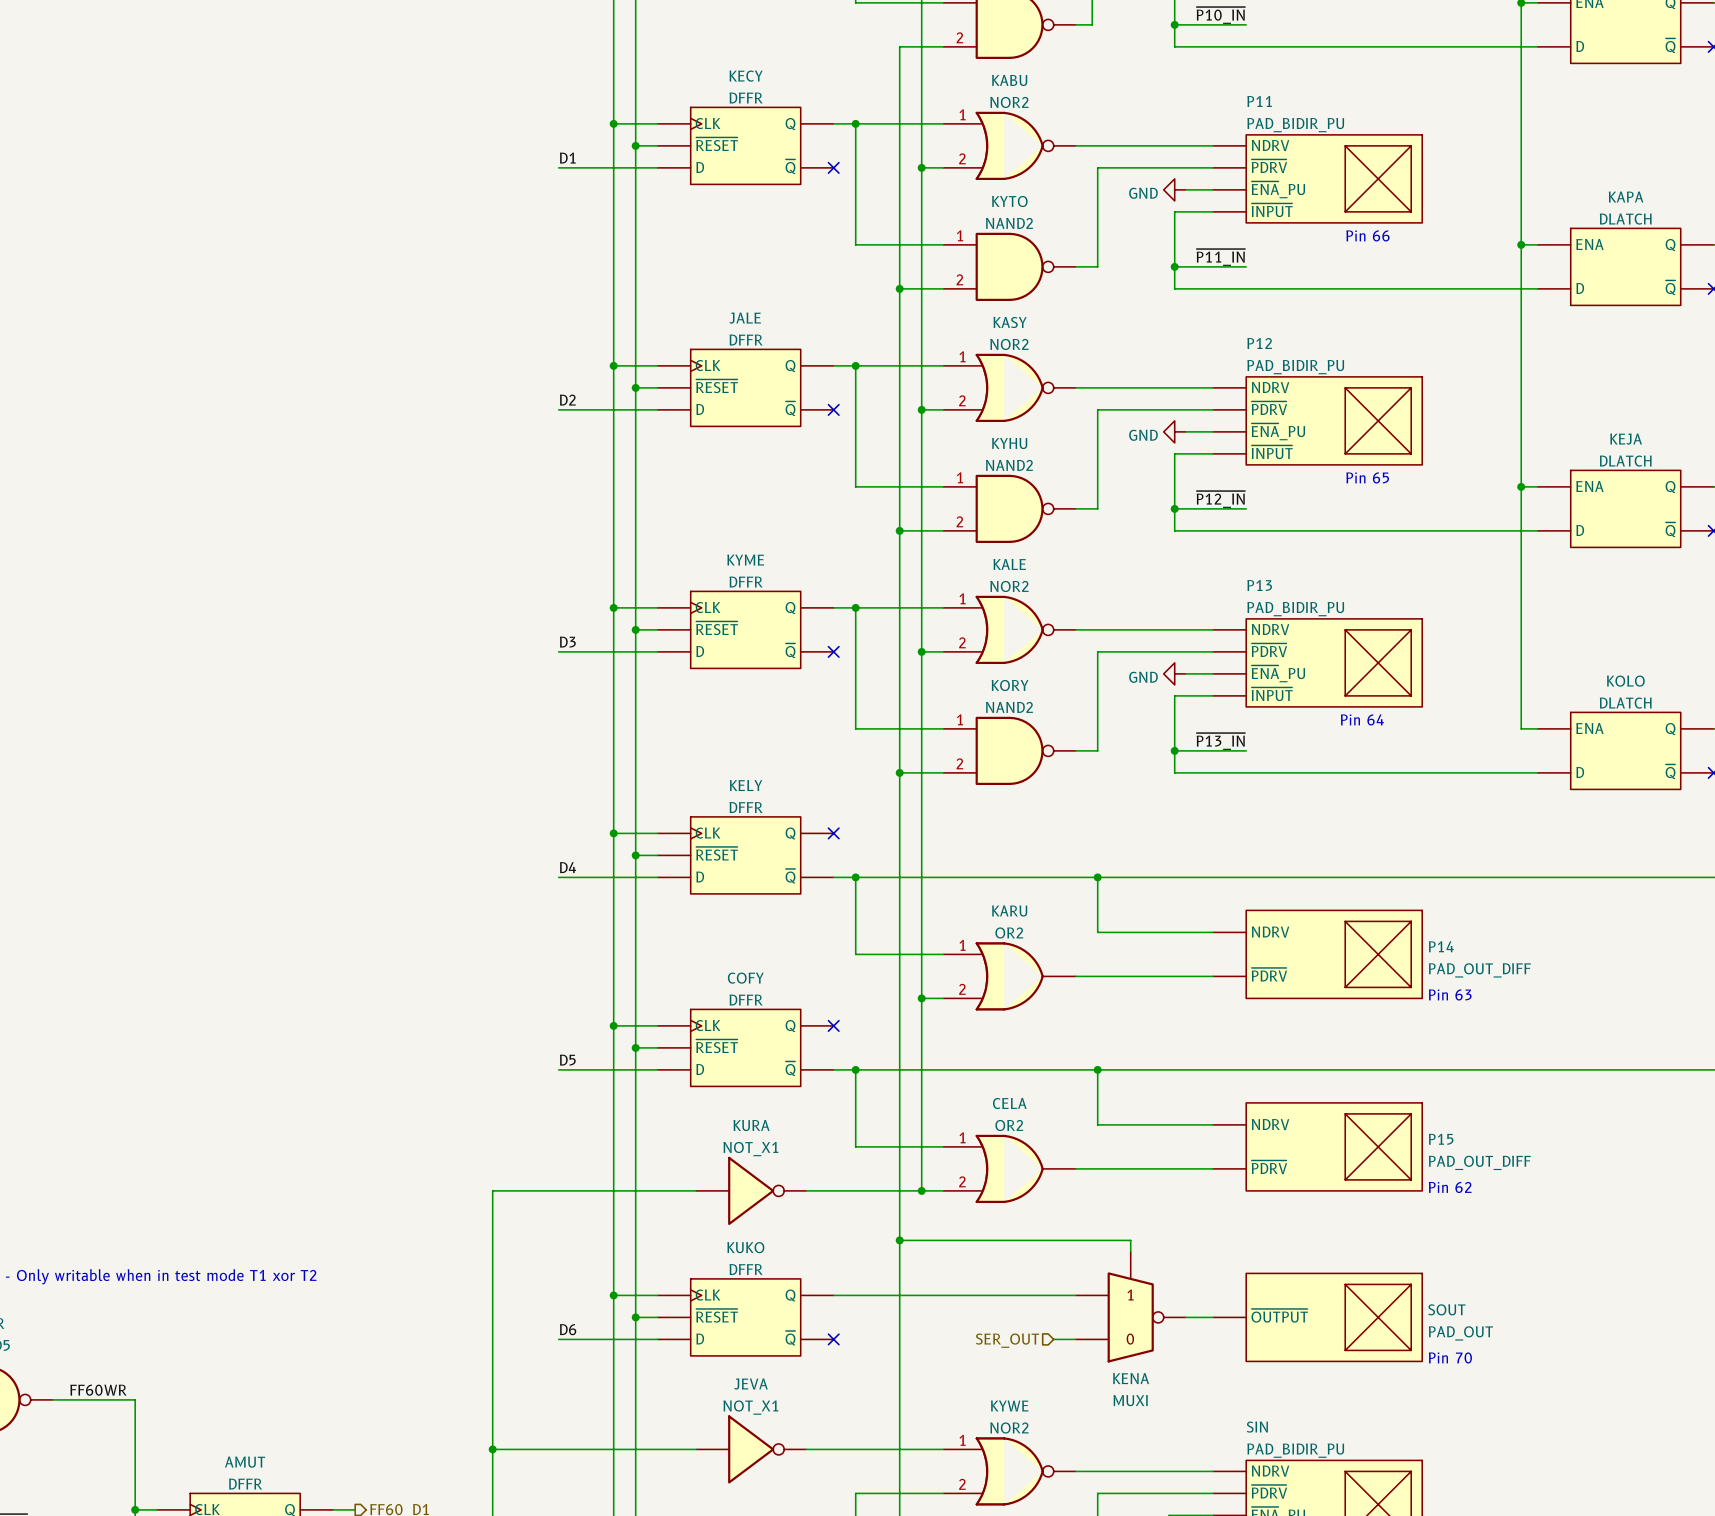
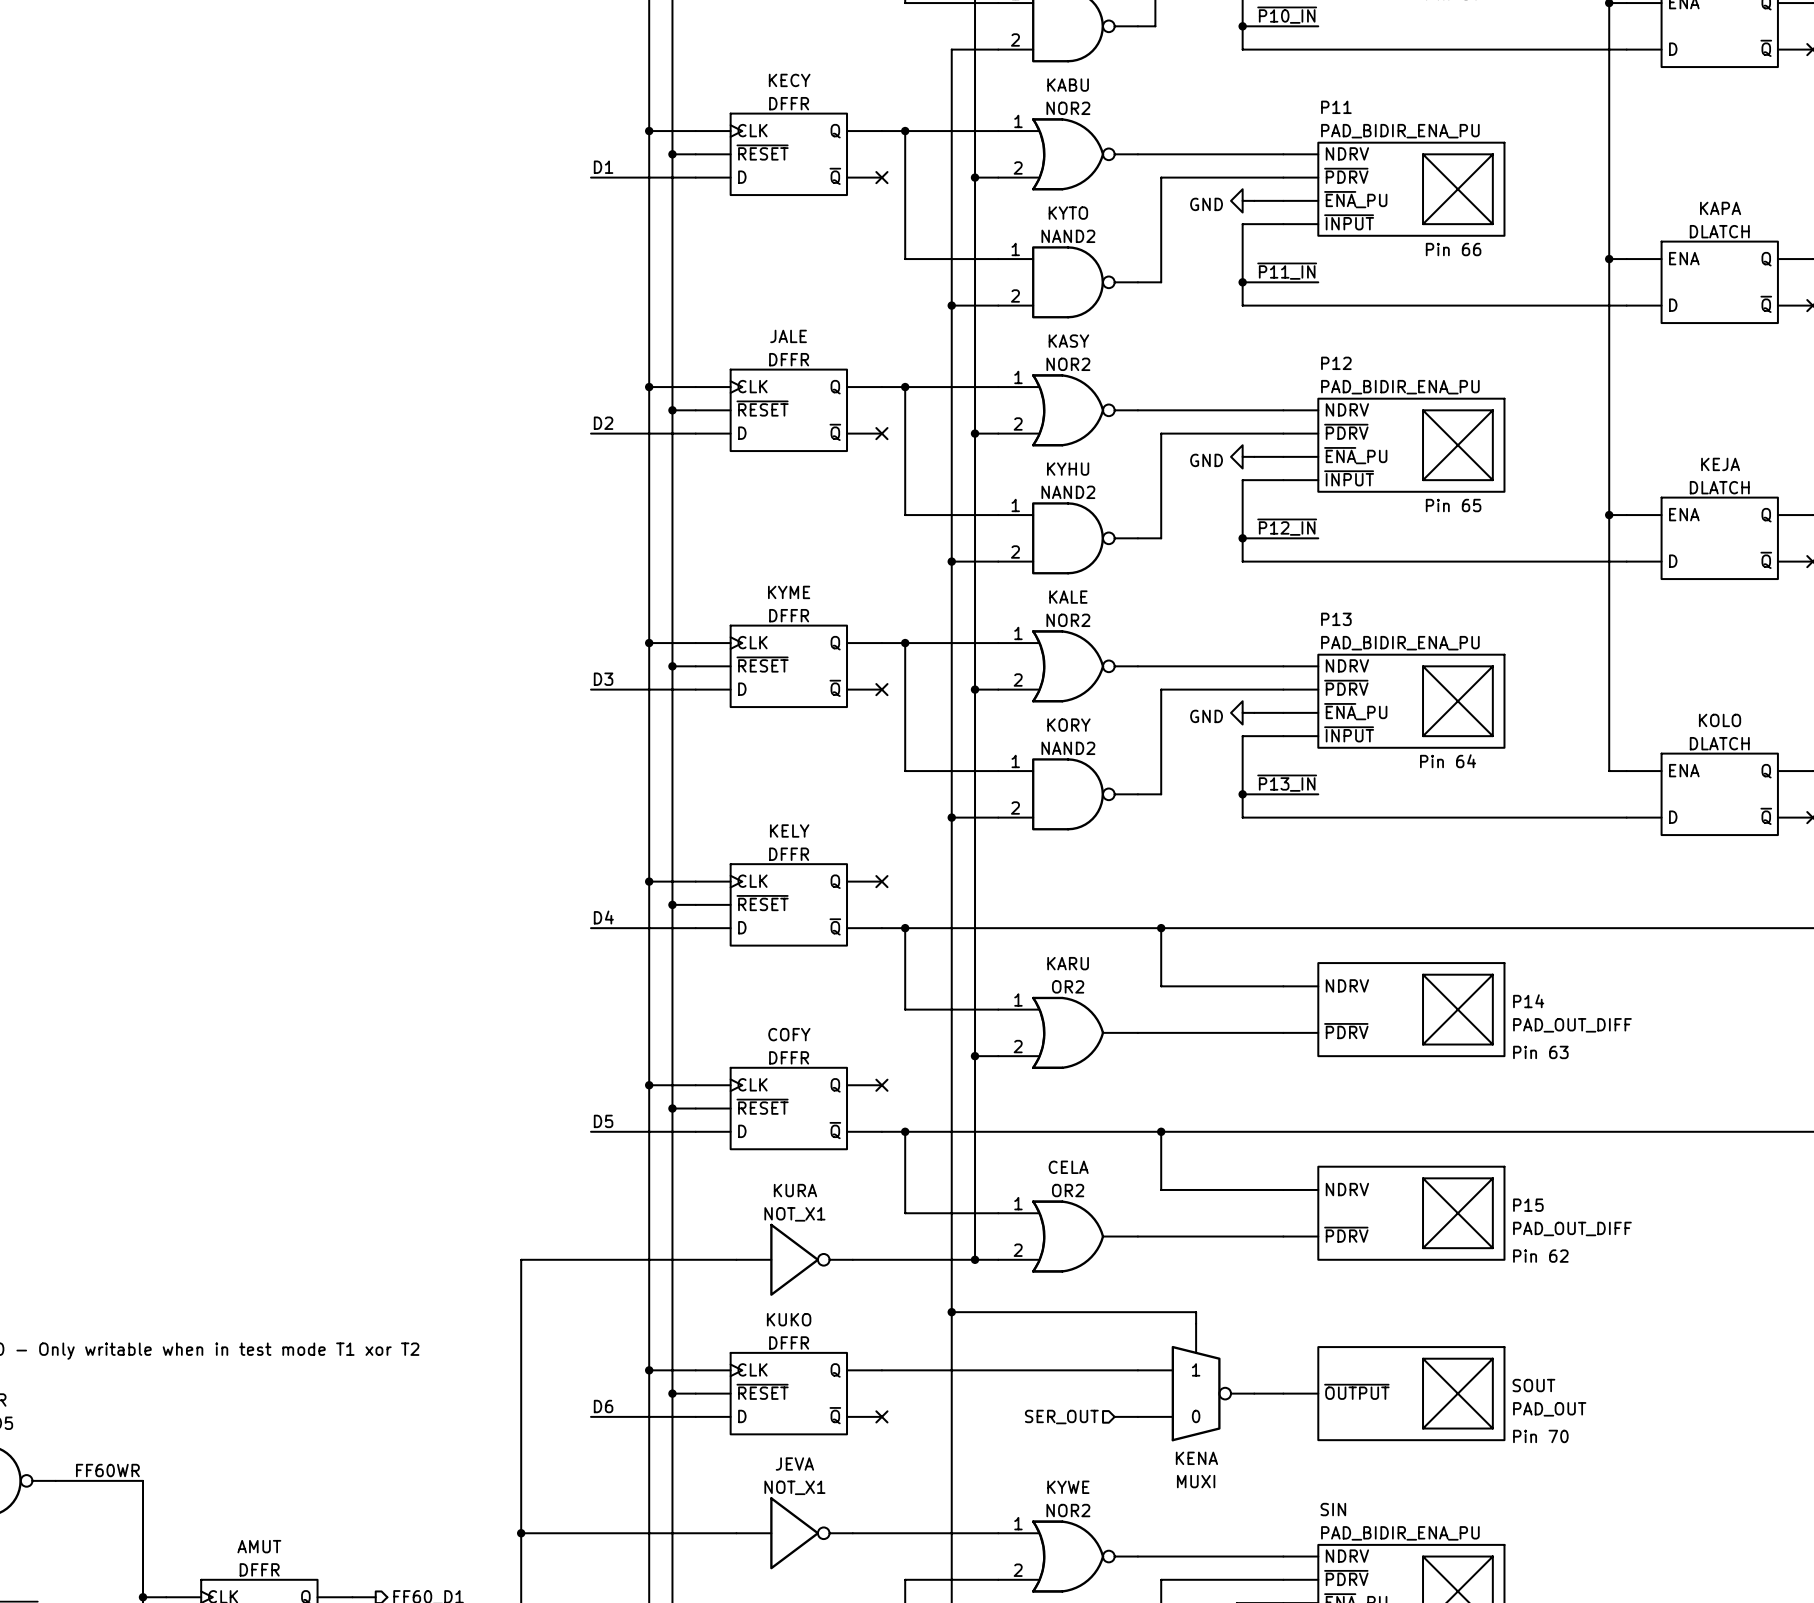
P11 value: PAD_BIDIR_PU (1295, 125) -> PAD_BIDIR_ENA_PU (1400, 131)
P12 value: PAD_BIDIR_PU (1295, 367) -> PAD_BIDIR_ENA_PU (1400, 387)
P13 value: PAD_BIDIR_PU (1295, 609) -> PAD_BIDIR_ENA_PU (1400, 643)
SIN value: PAD_BIDIR_PU (1295, 1450) -> PAD_BIDIR_ENA_PU (1400, 1533)

